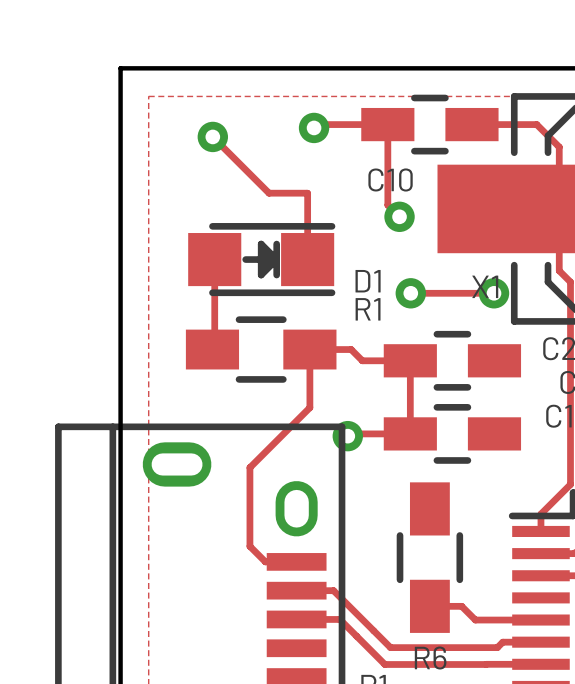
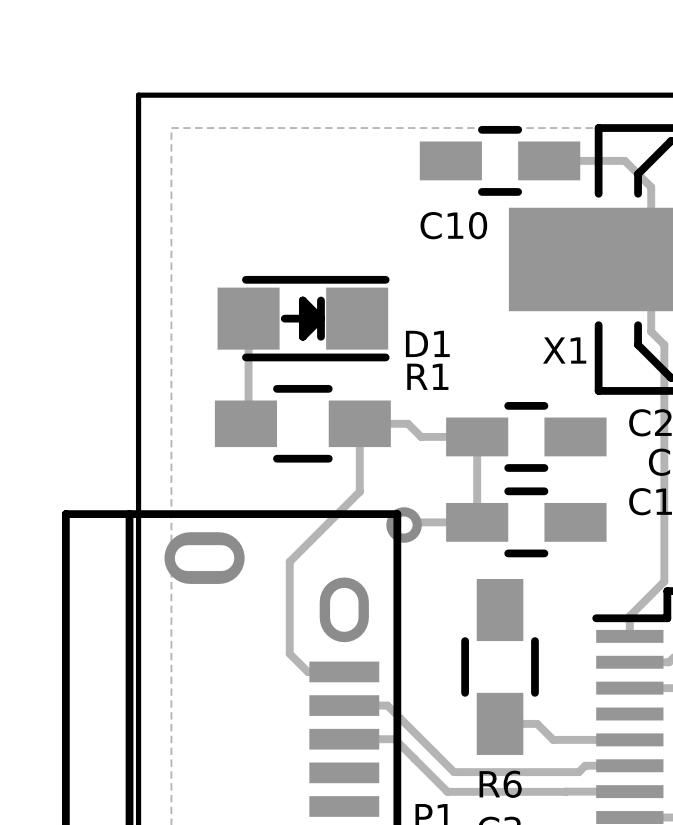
track: (314, 127) (317, 124) (387, 124) (387, 205) (399, 216) -> none
via: (314, 127) -> none
track: (212, 136) (269, 193) (307, 193) -> none
via: (212, 136) -> none
track: (307, 193) (307, 259) -> none
via: (399, 216) -> none
track: (410, 293) (494, 293) -> none
via: (410, 293) -> none
via: (494, 293) -> none

